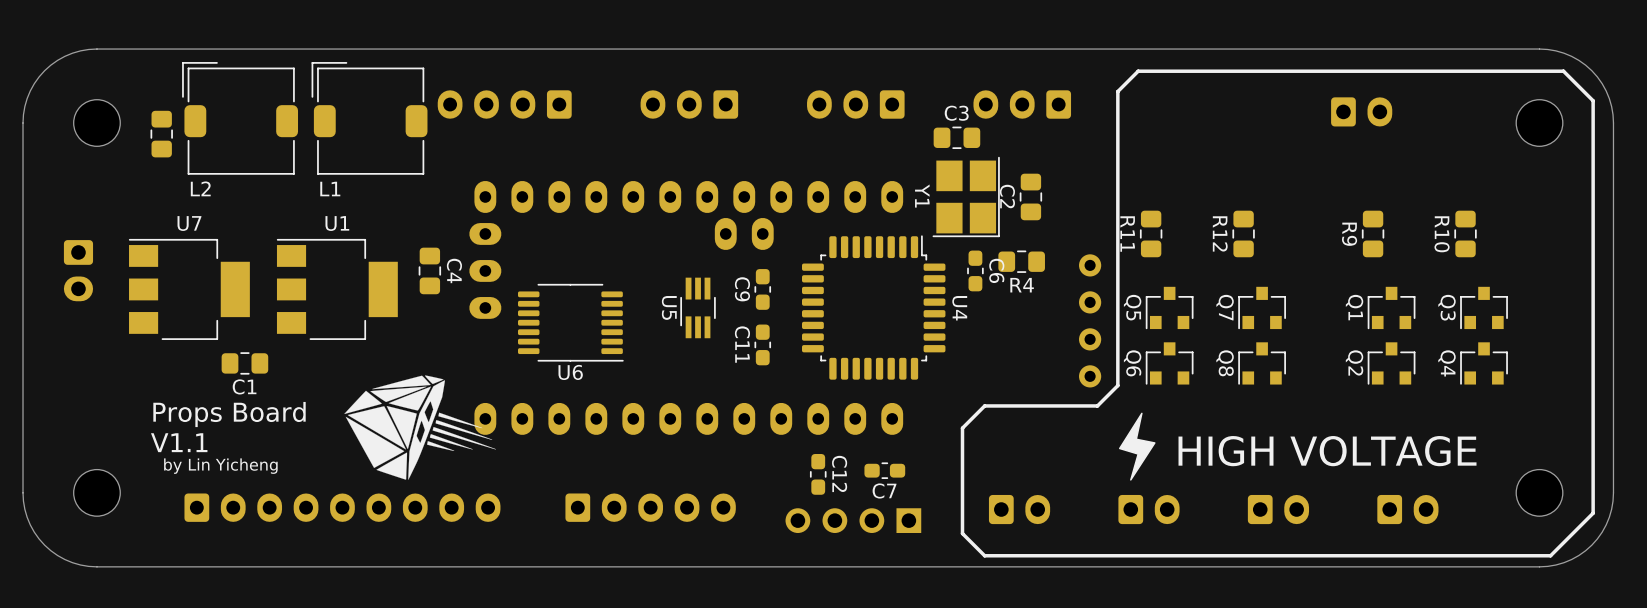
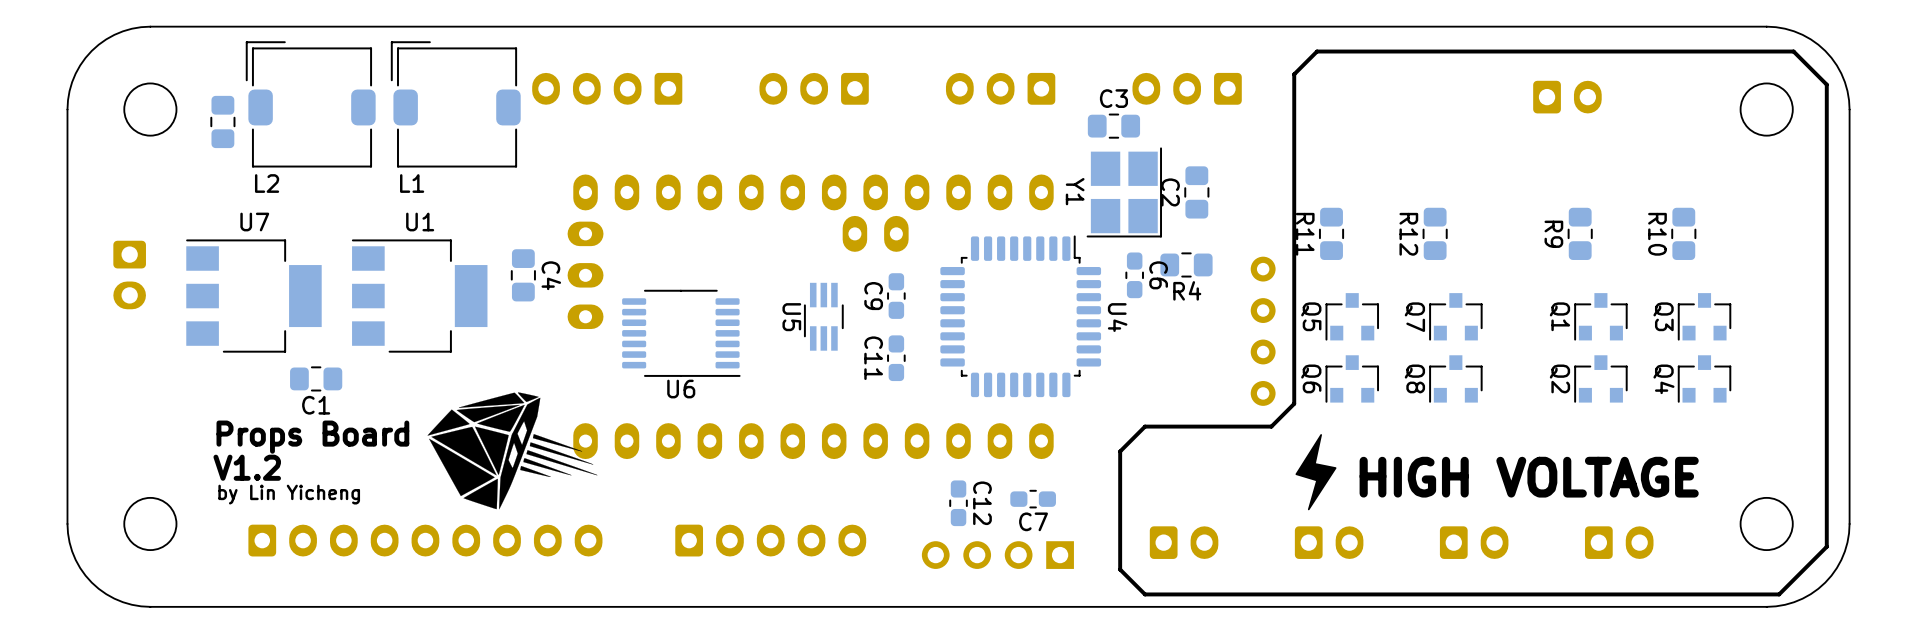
text: V1.1 (179, 442) -> V1.2 (247, 467)

